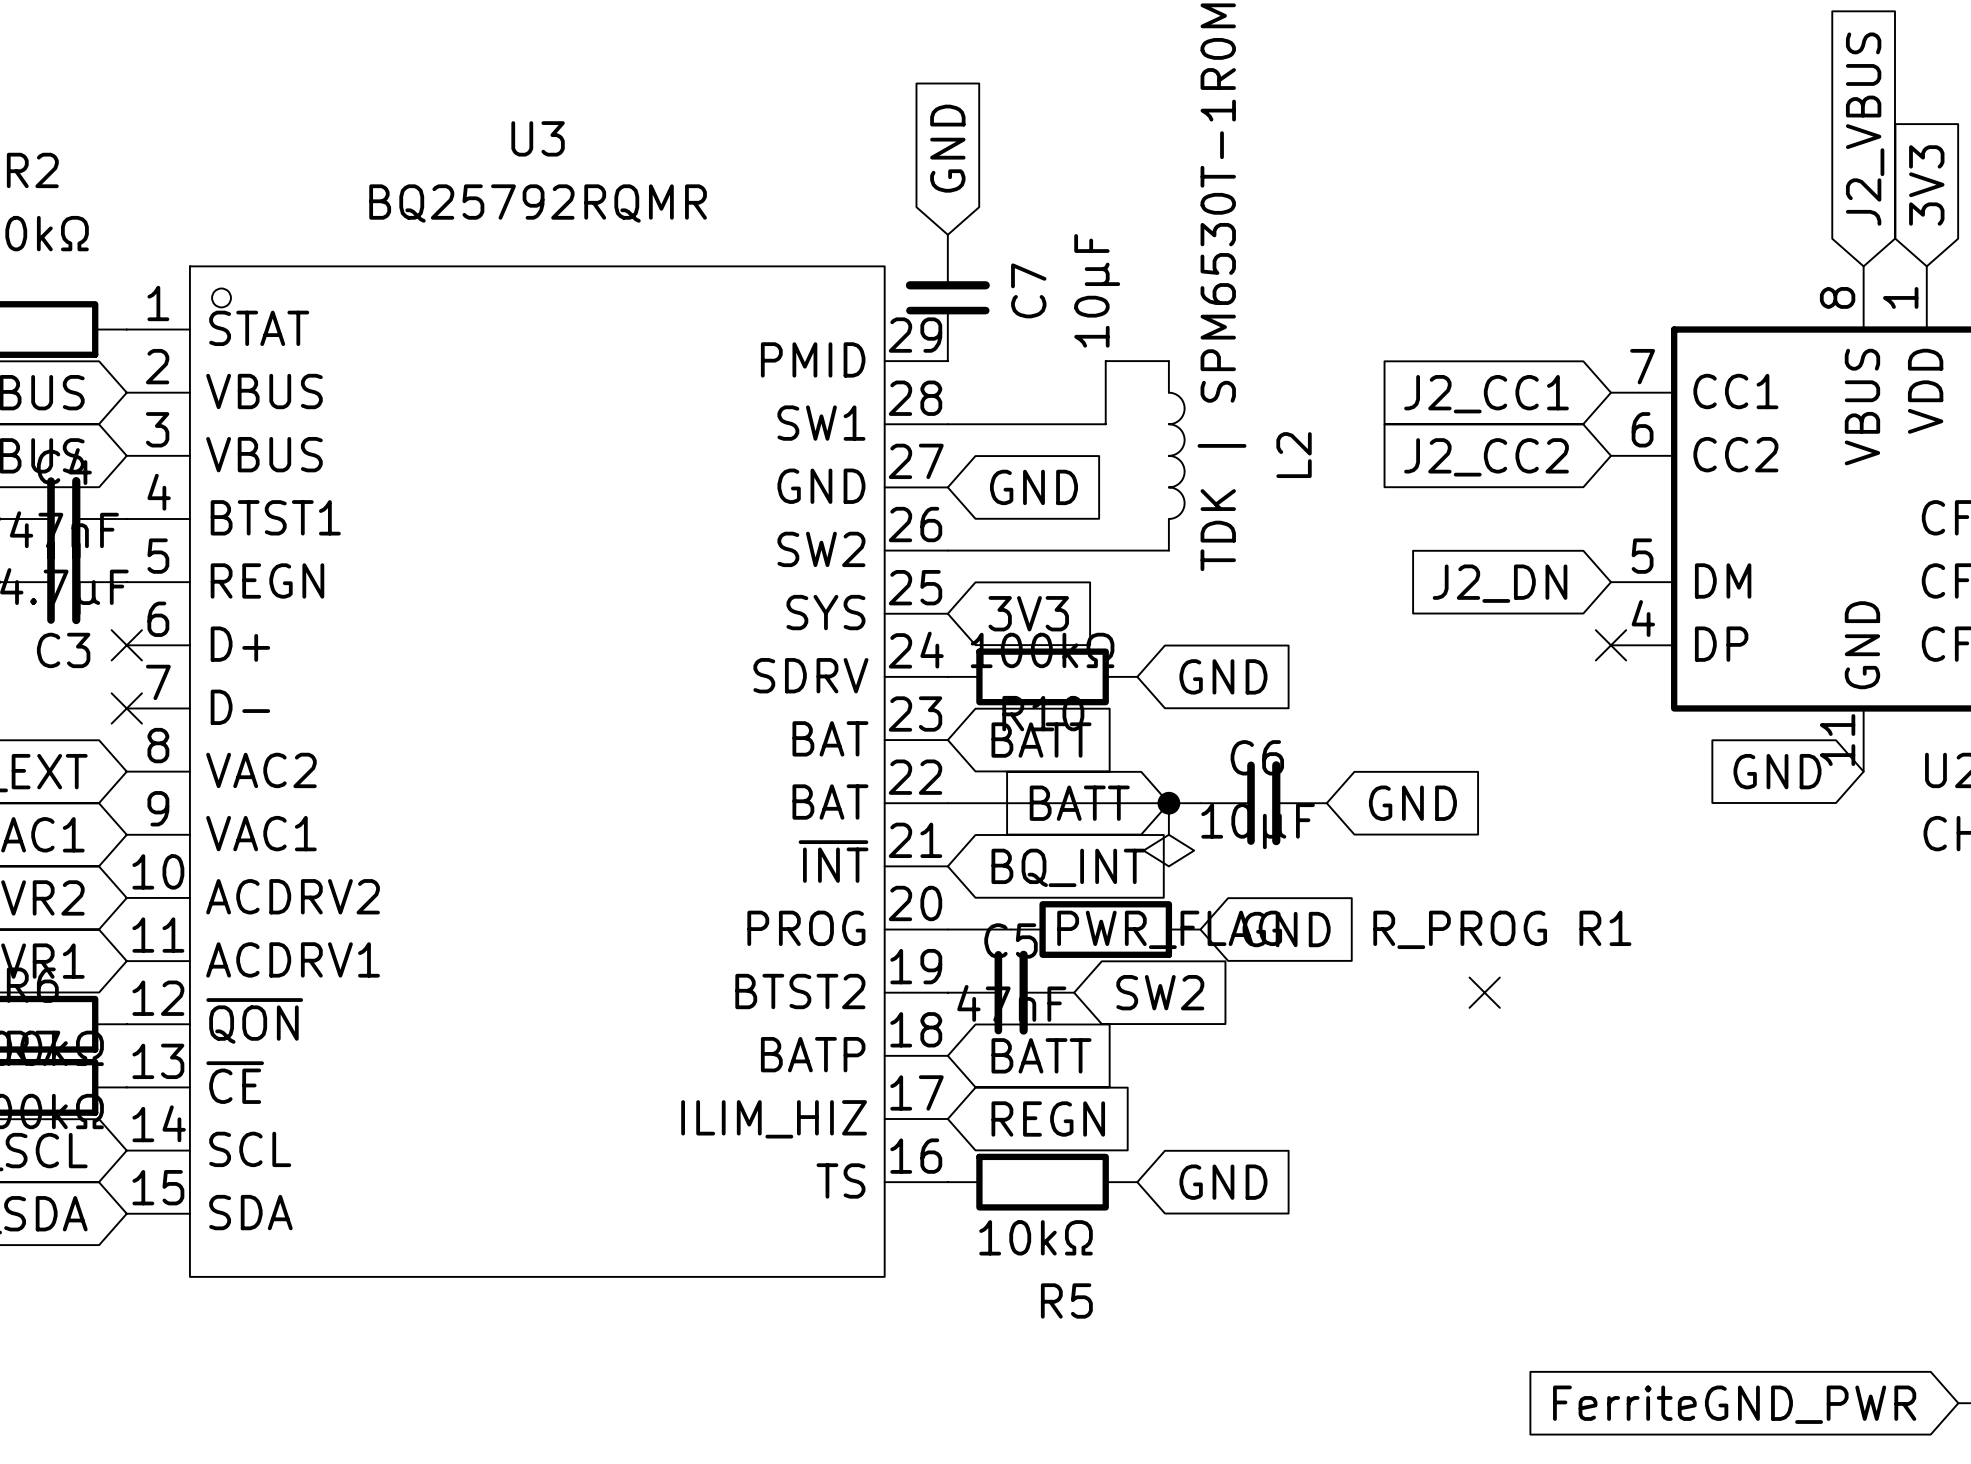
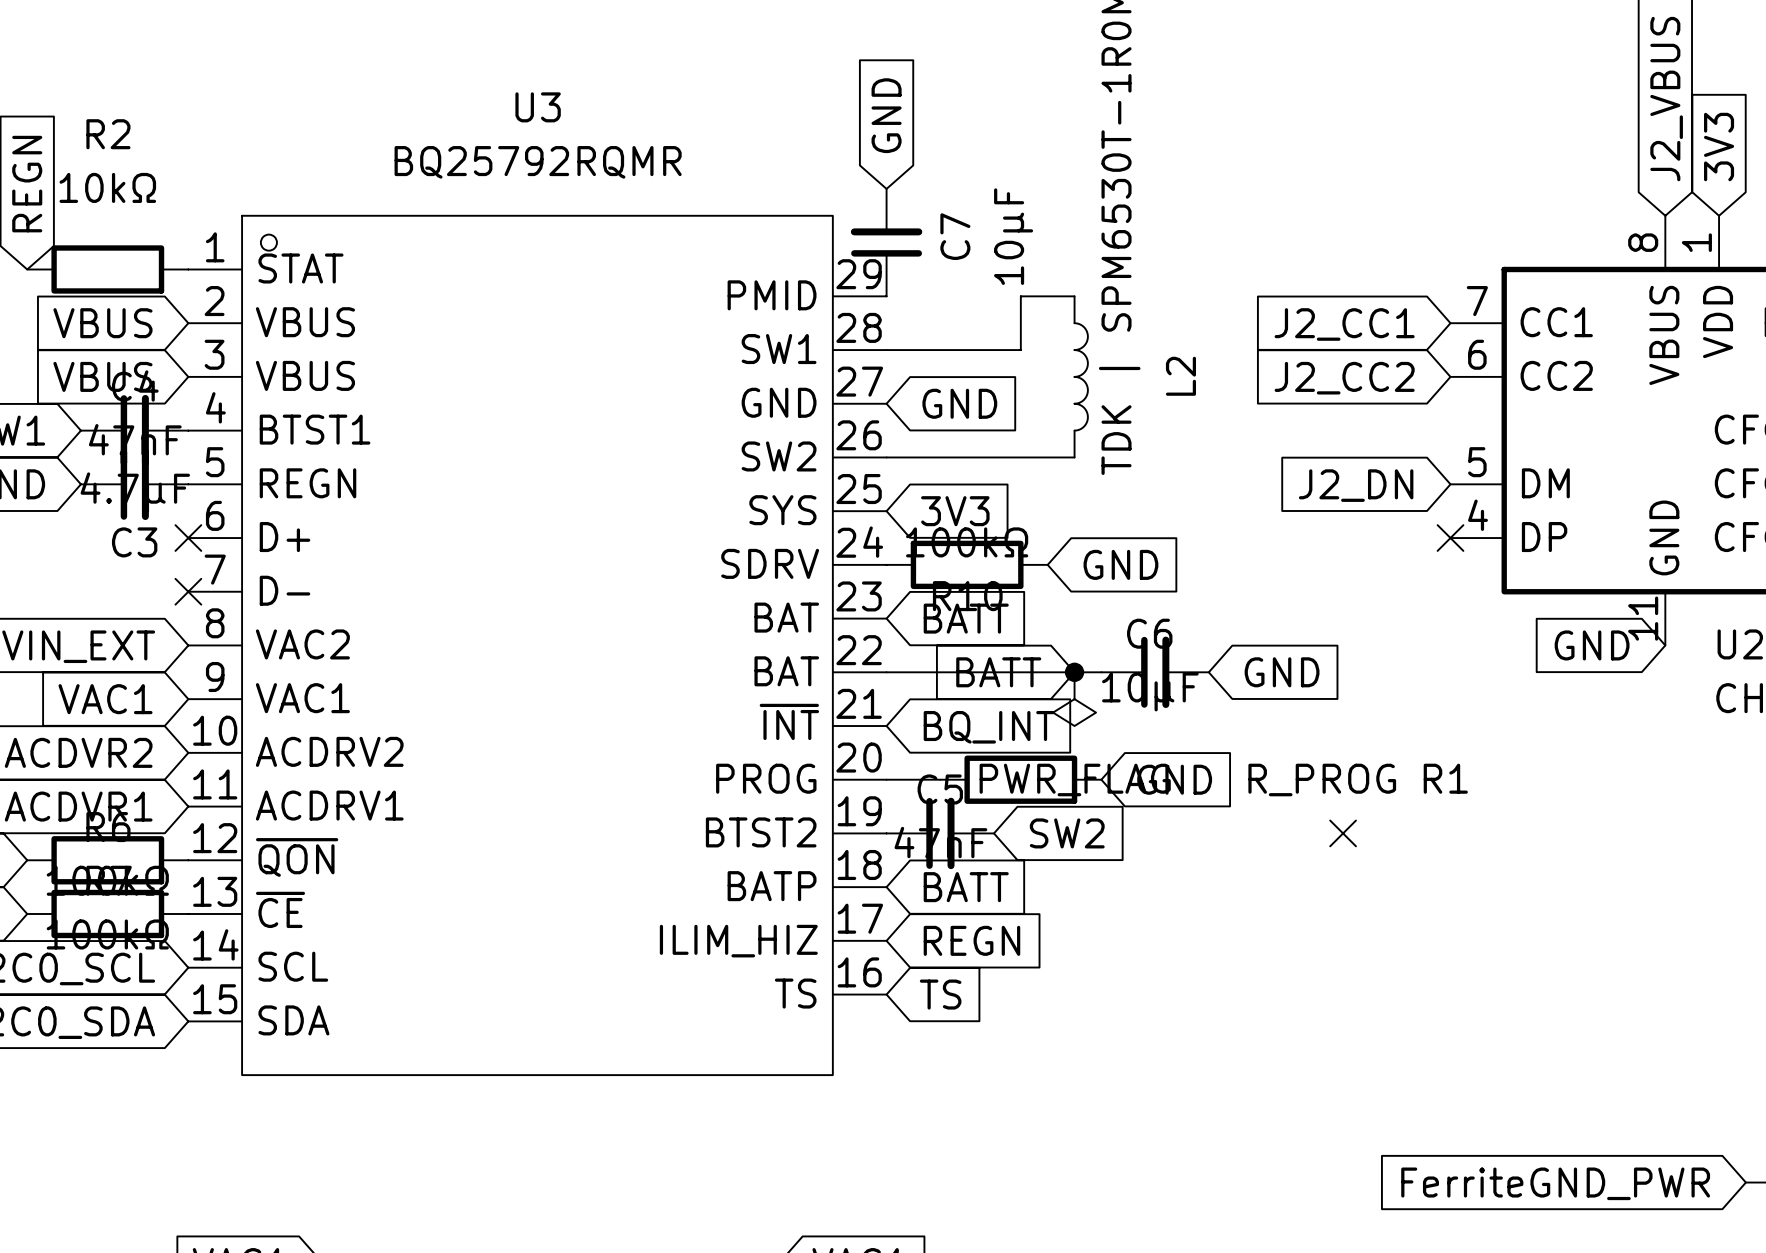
global label: none -> TS (940, 994)
R5: 10kΩ (1042, 1182) -> none
global label: GND (1223, 1182) -> none

